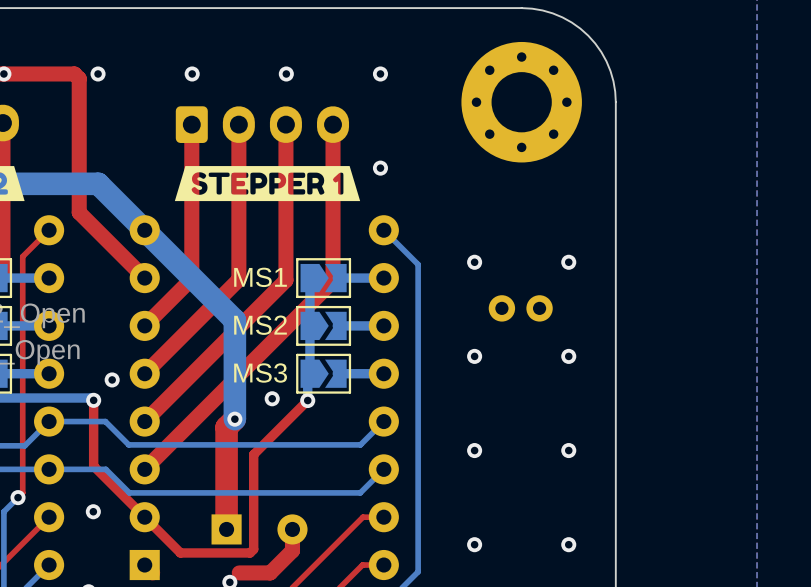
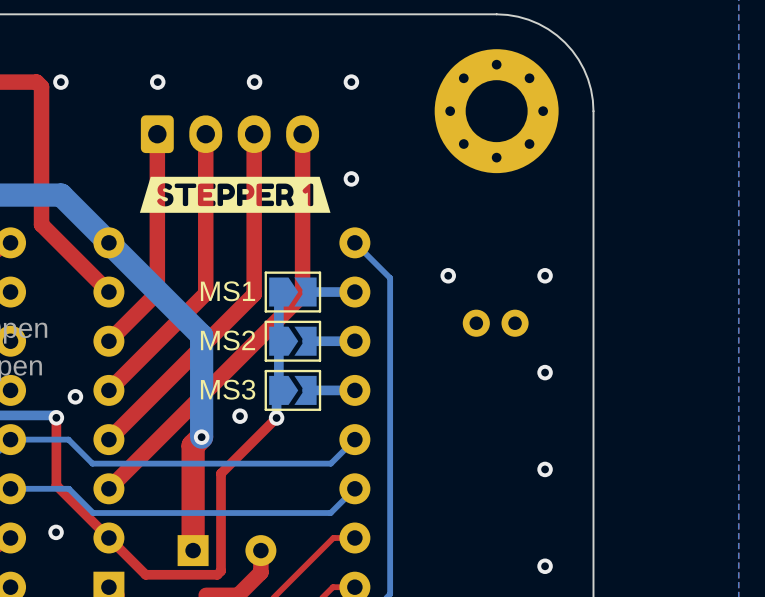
via: (474, 356) -> none
via: (474, 450) -> none
via: (474, 544) -> none

